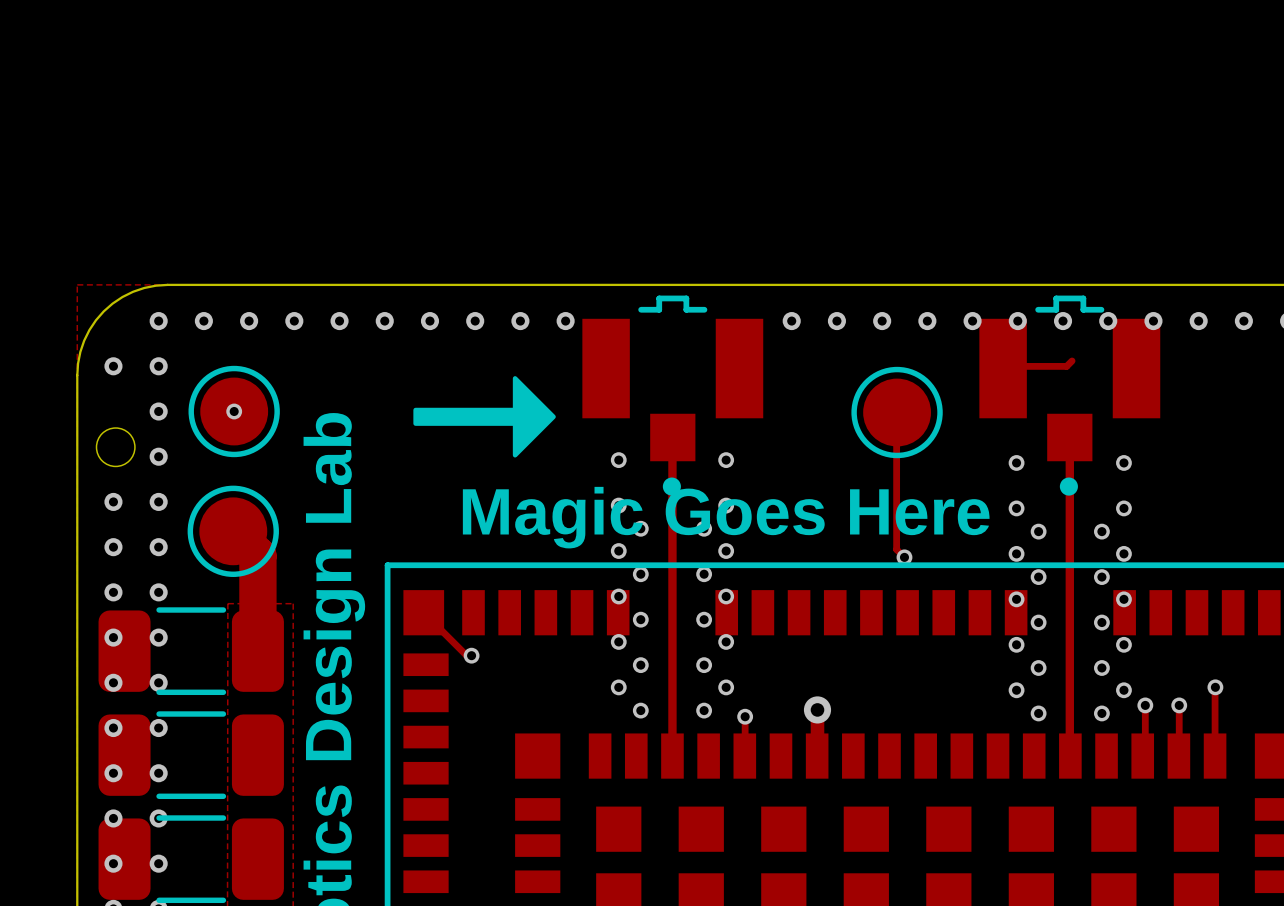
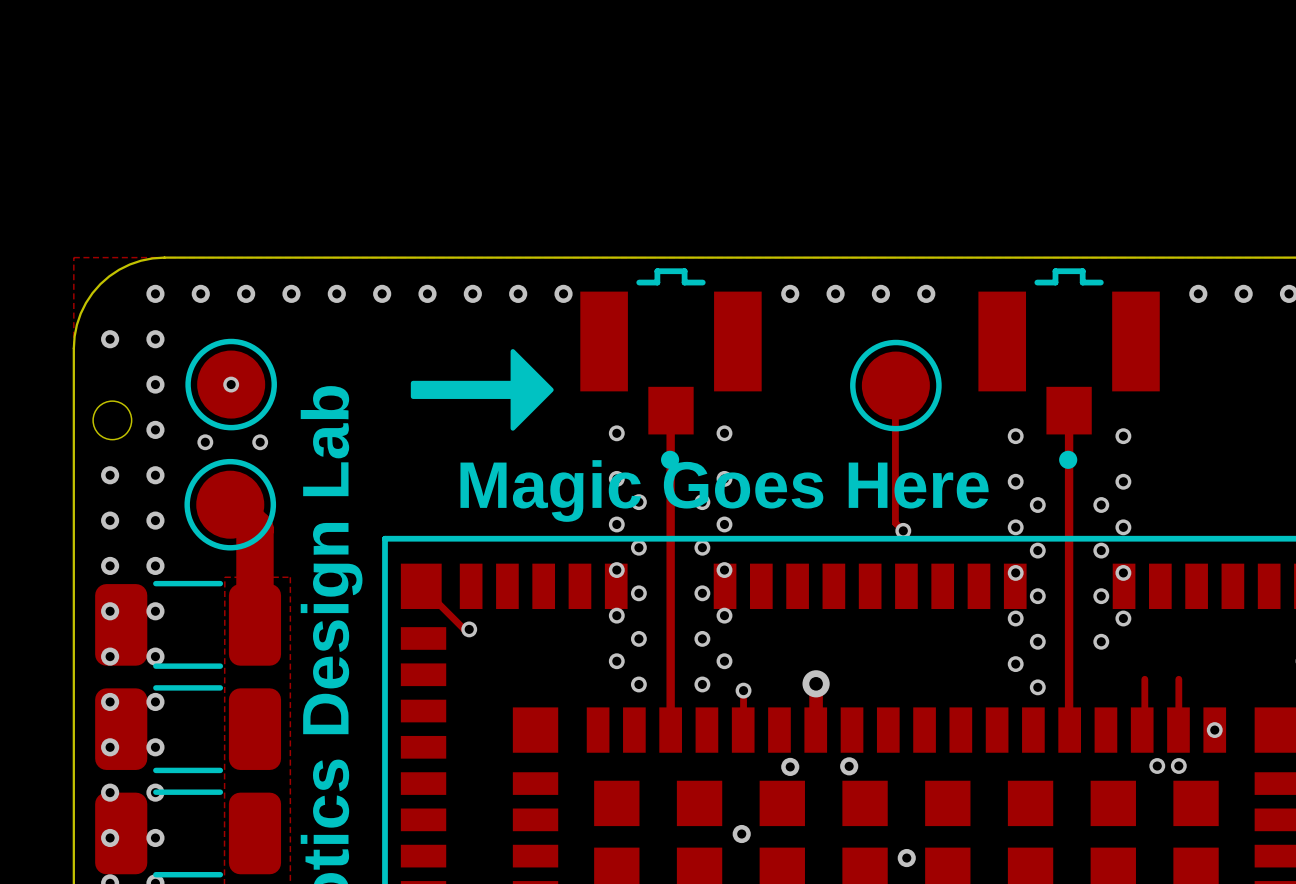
via: (972, 321) -> none
via: (1017, 321) -> none
via: (1063, 321) -> none
via: (1108, 321) -> none
via: (1153, 321) -> none
track: (1072, 360) (1066, 366) (1010, 366) -> none
via: none -> (205, 442)
via: none -> (260, 442)
track: (1215, 687) (1215, 756) -> none
via: (1215, 687) -> none
via: (1123, 690) -> none
via: (1145, 705) -> none
via: (1179, 705) -> none
via: (1101, 713) -> none
via: none -> (1214, 730)
via: none -> (1157, 766)
via: none -> (1178, 766)
via: none -> (790, 766)
via: none -> (849, 766)
via: none -> (741, 834)
via: none -> (906, 858)

